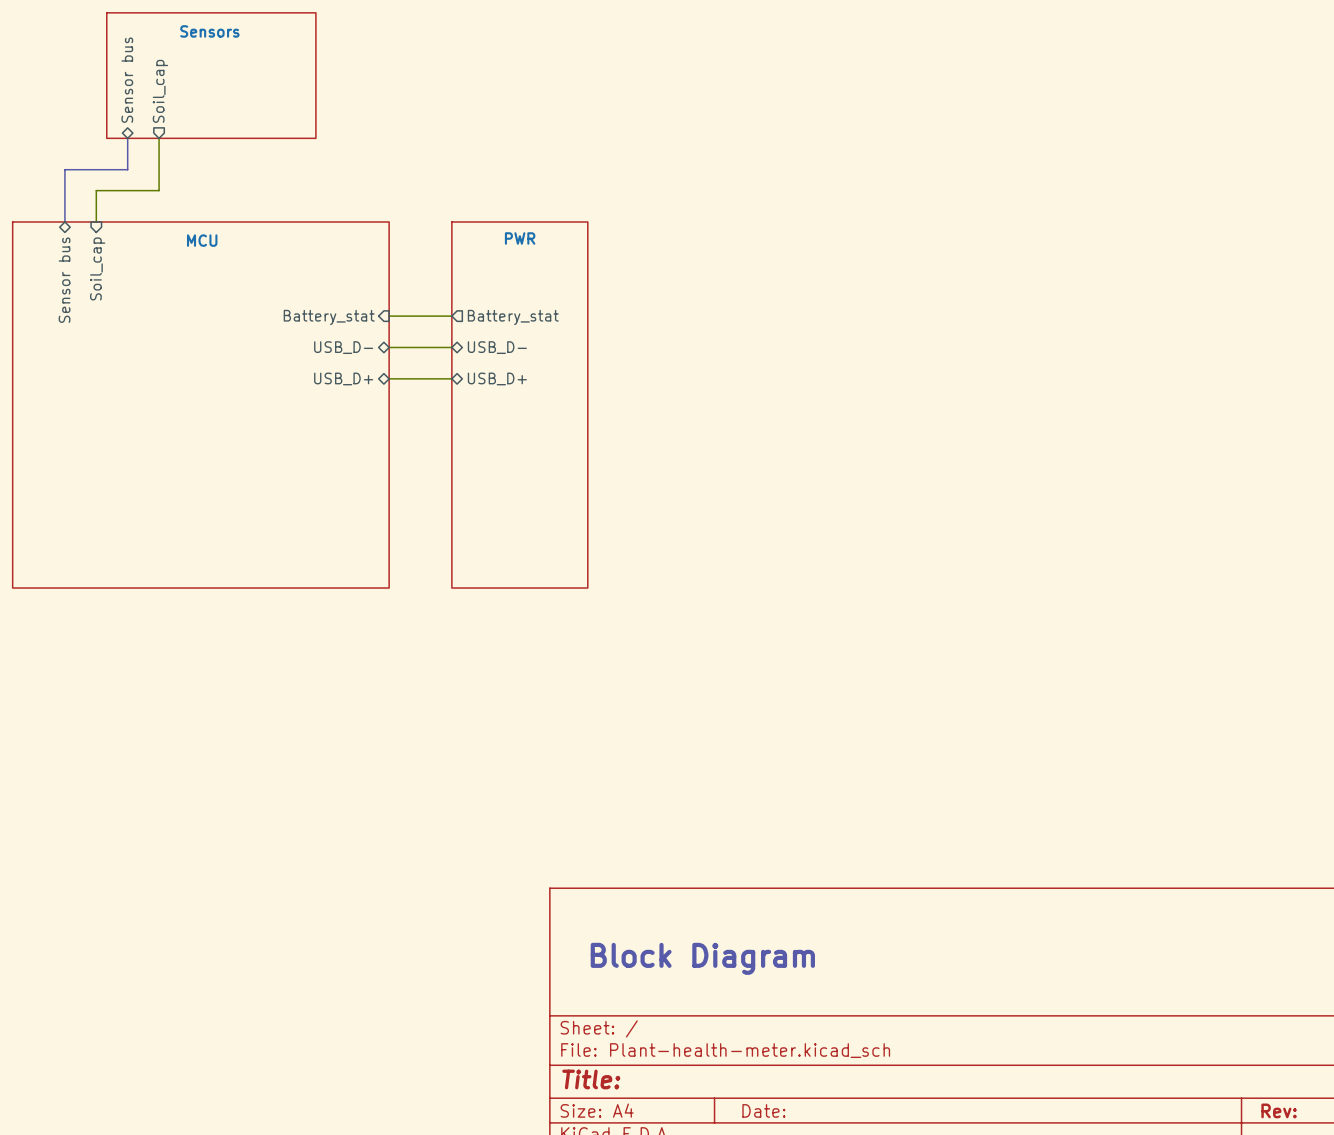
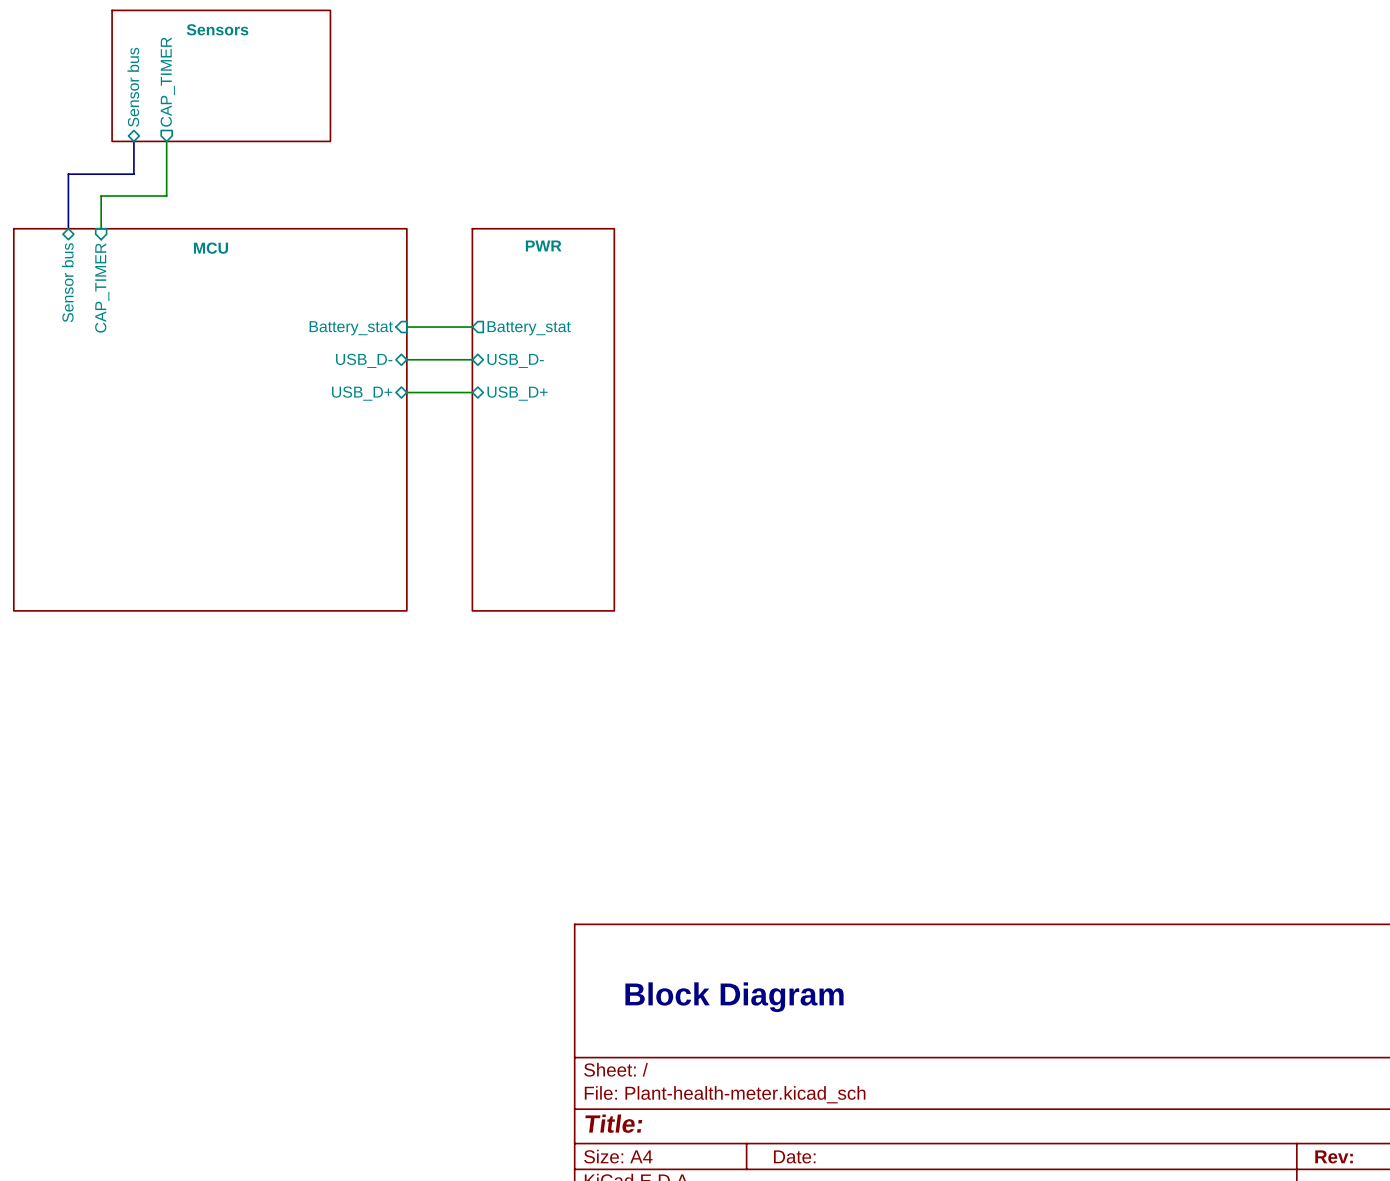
sheet pin: Soil_cap (160, 91) -> CAP_TIMER (167, 82)
sheet pin: Soil_cap (97, 268) -> CAP_TIMER (102, 288)

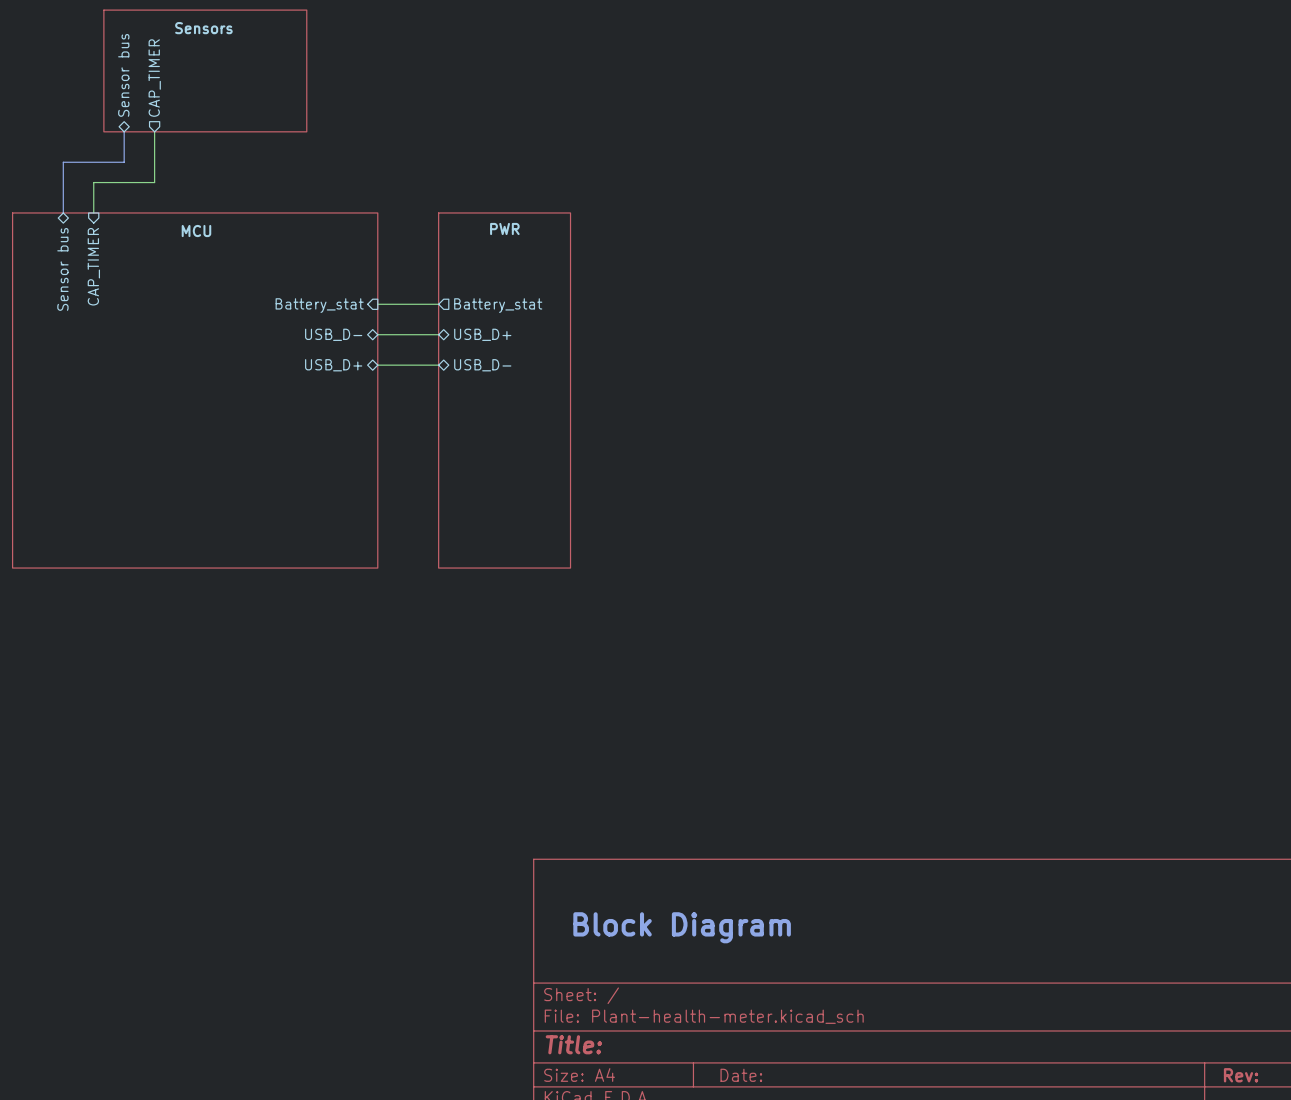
sheet pin: USB_D- (515, 360) -> USB_D+ (482, 334)
sheet pin: USB_D+ (517, 393) -> USB_D- (482, 365)

